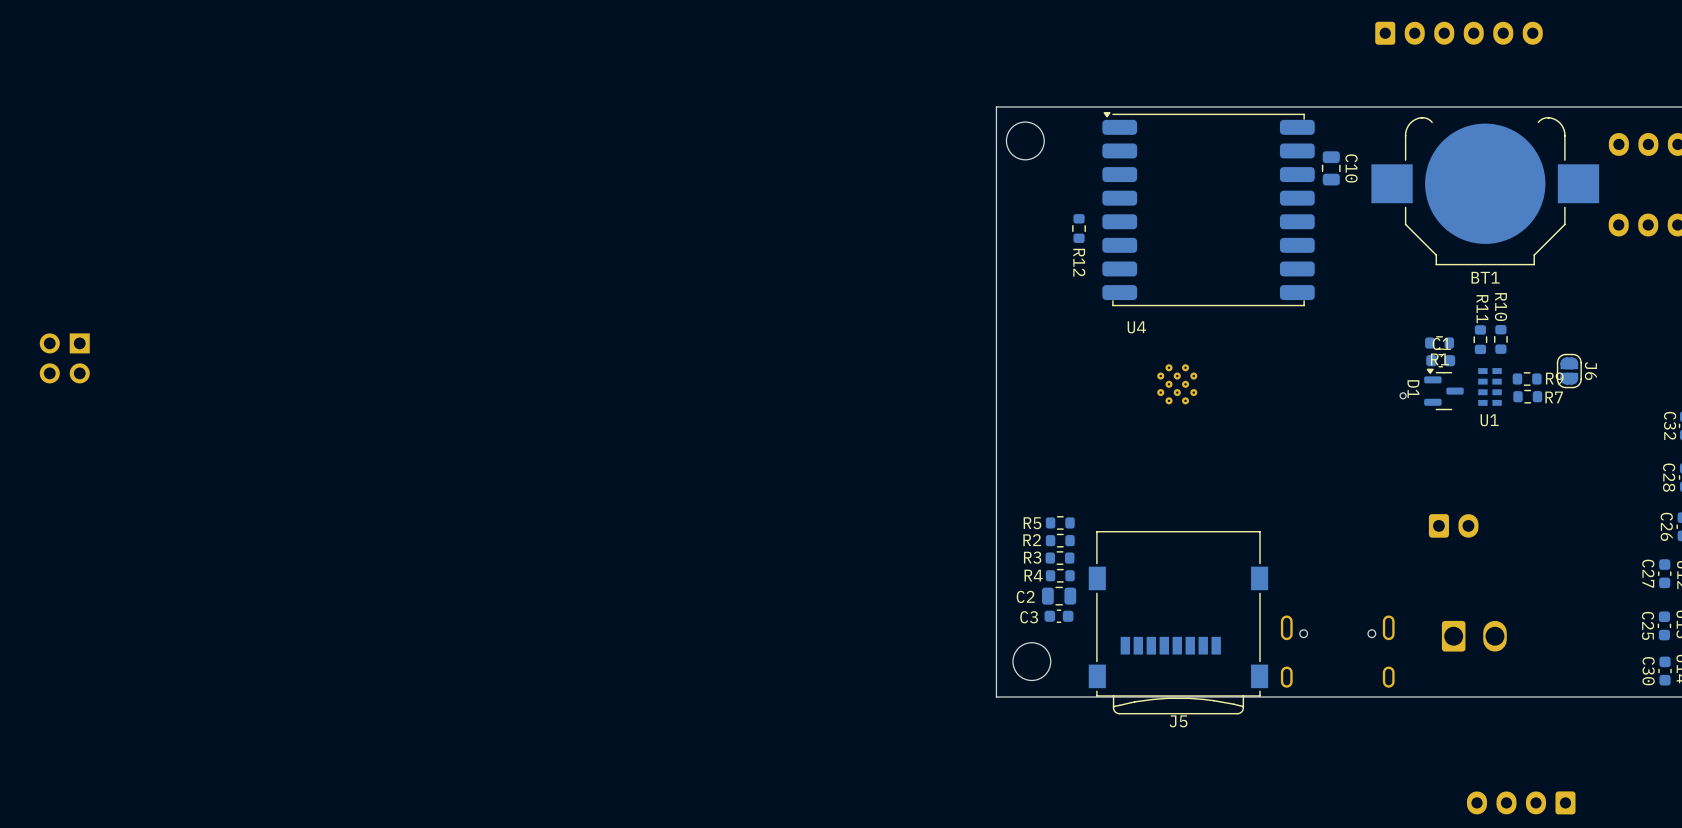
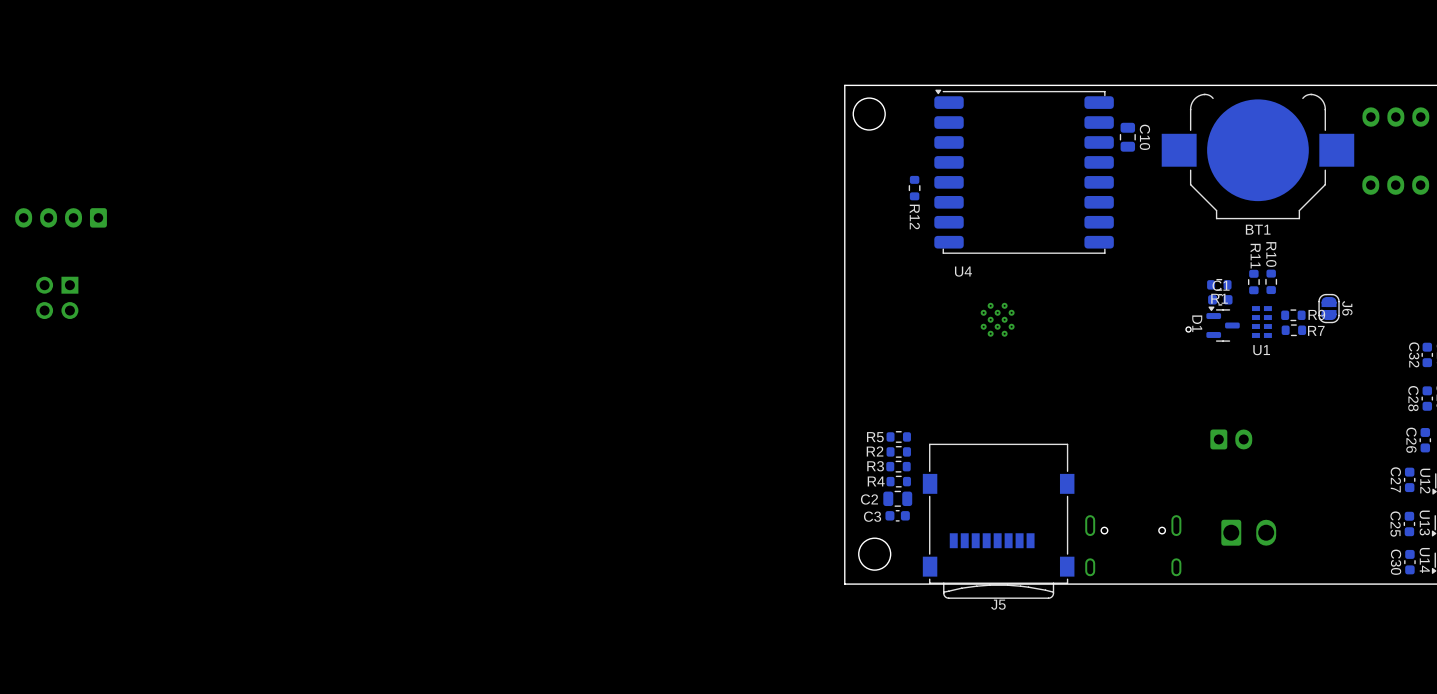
part: (1459, 33) -> none
part: none -> (61, 217)
part: (1521, 802) -> none

